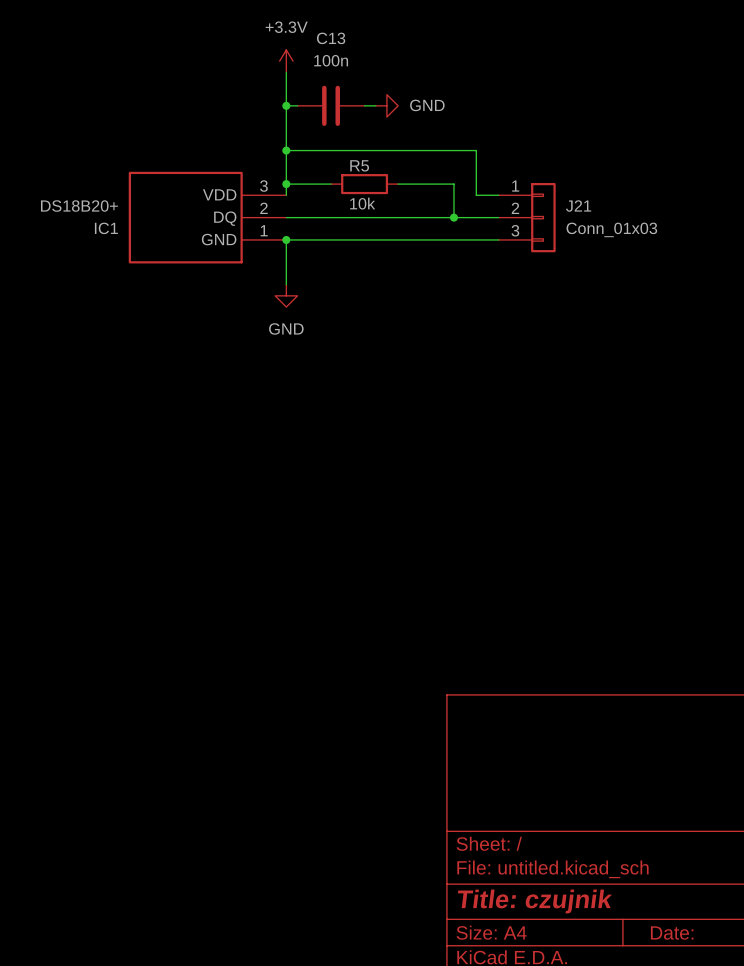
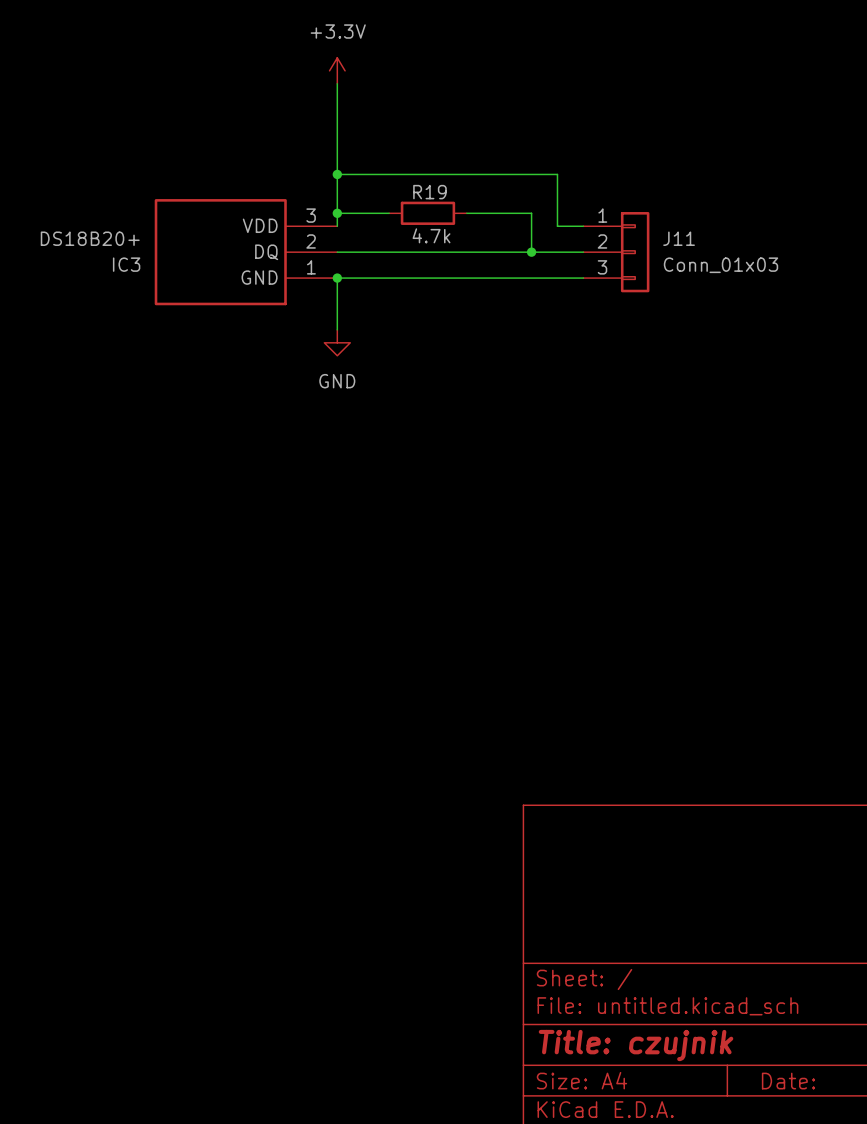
wire: (286, 105) (297, 105) -> none
junction: (286, 105) -> none
C13: 100n (331, 105) -> none
wire: (364, 105) (375, 105) -> none
power symbol: GND (386, 105) -> none
R5 name: R5 (359, 165) -> R19 (429, 192)
R5 value: 10k (362, 203) -> 4.7k (431, 235)
J21 name: J21 (578, 206) -> J11 (679, 238)
IC1 name: IC1 (106, 228) -> IC3 (126, 264)

